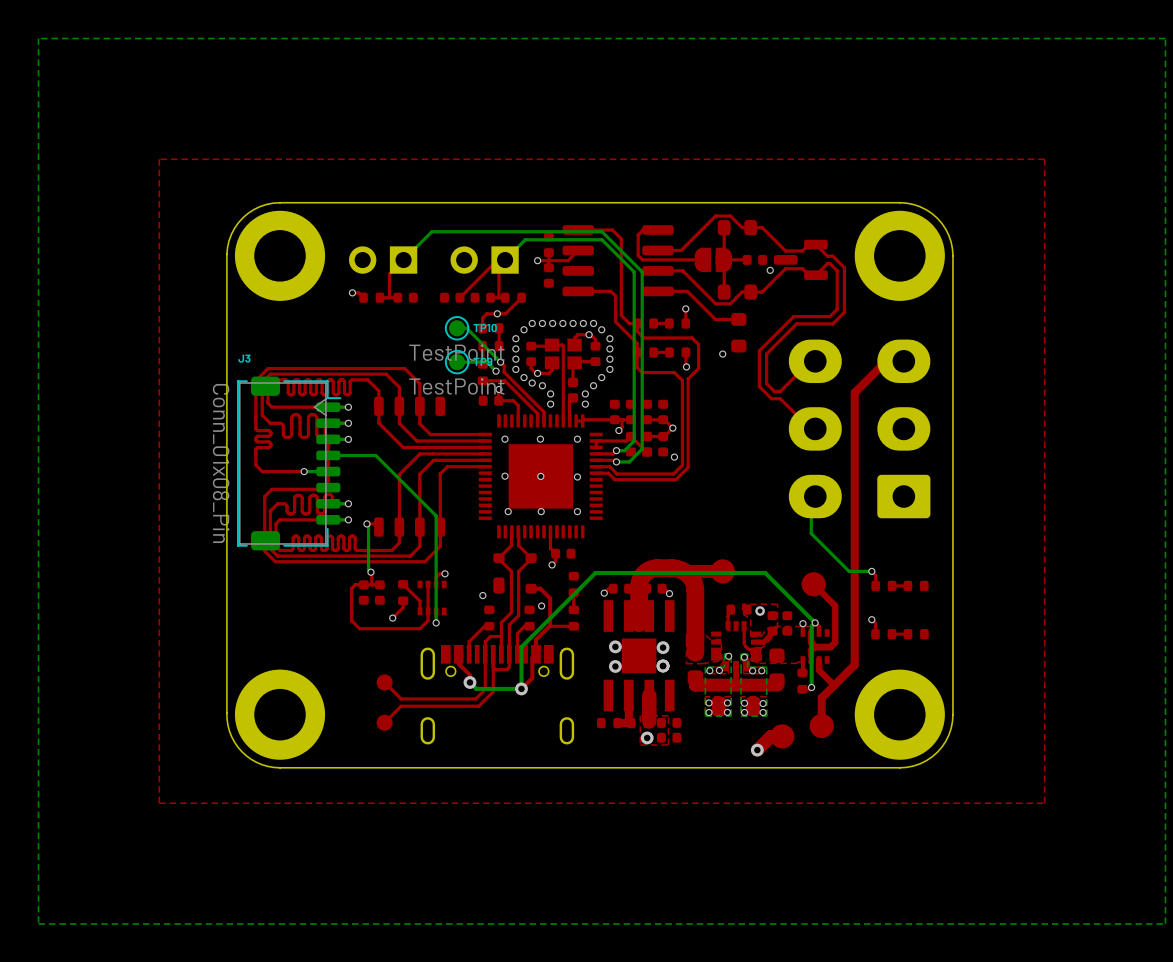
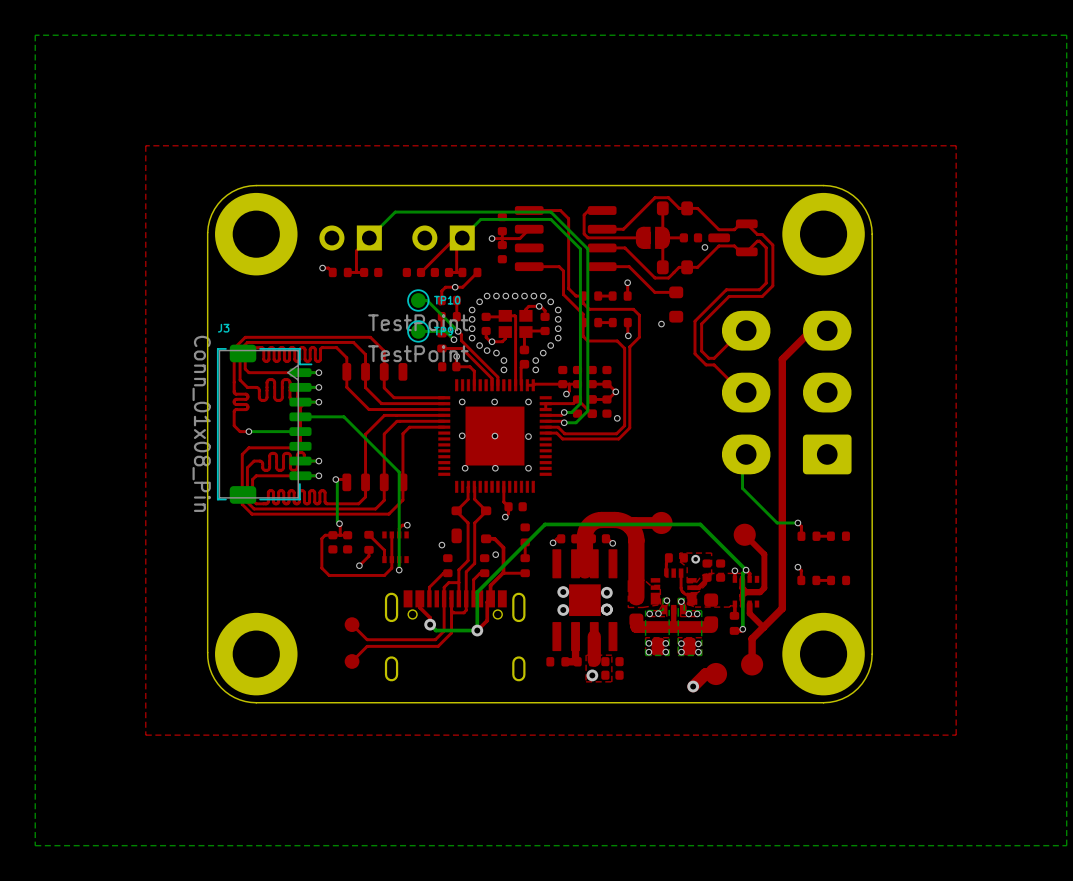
top track: (304, 471) (271, 471) -> none
bottom track: none -> (278, 431) (248, 431)
via position: (304, 471) -> (248, 431)

